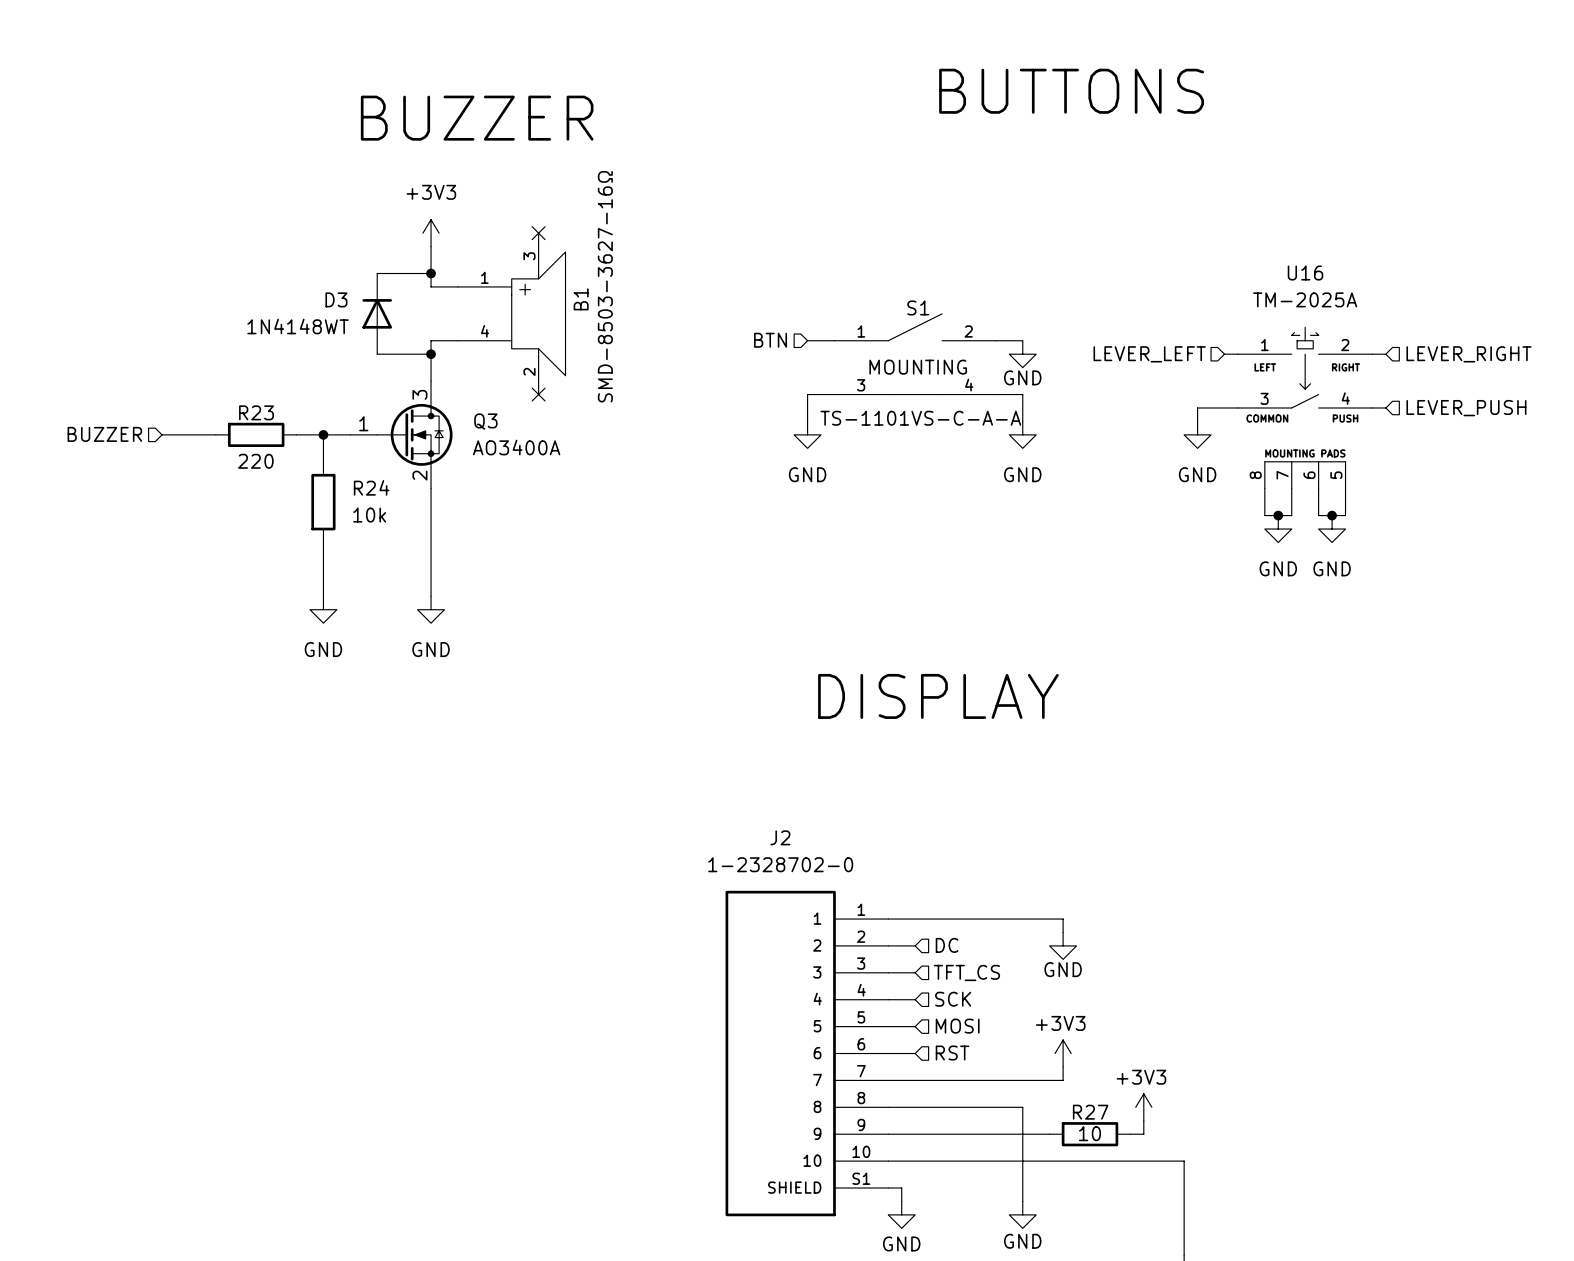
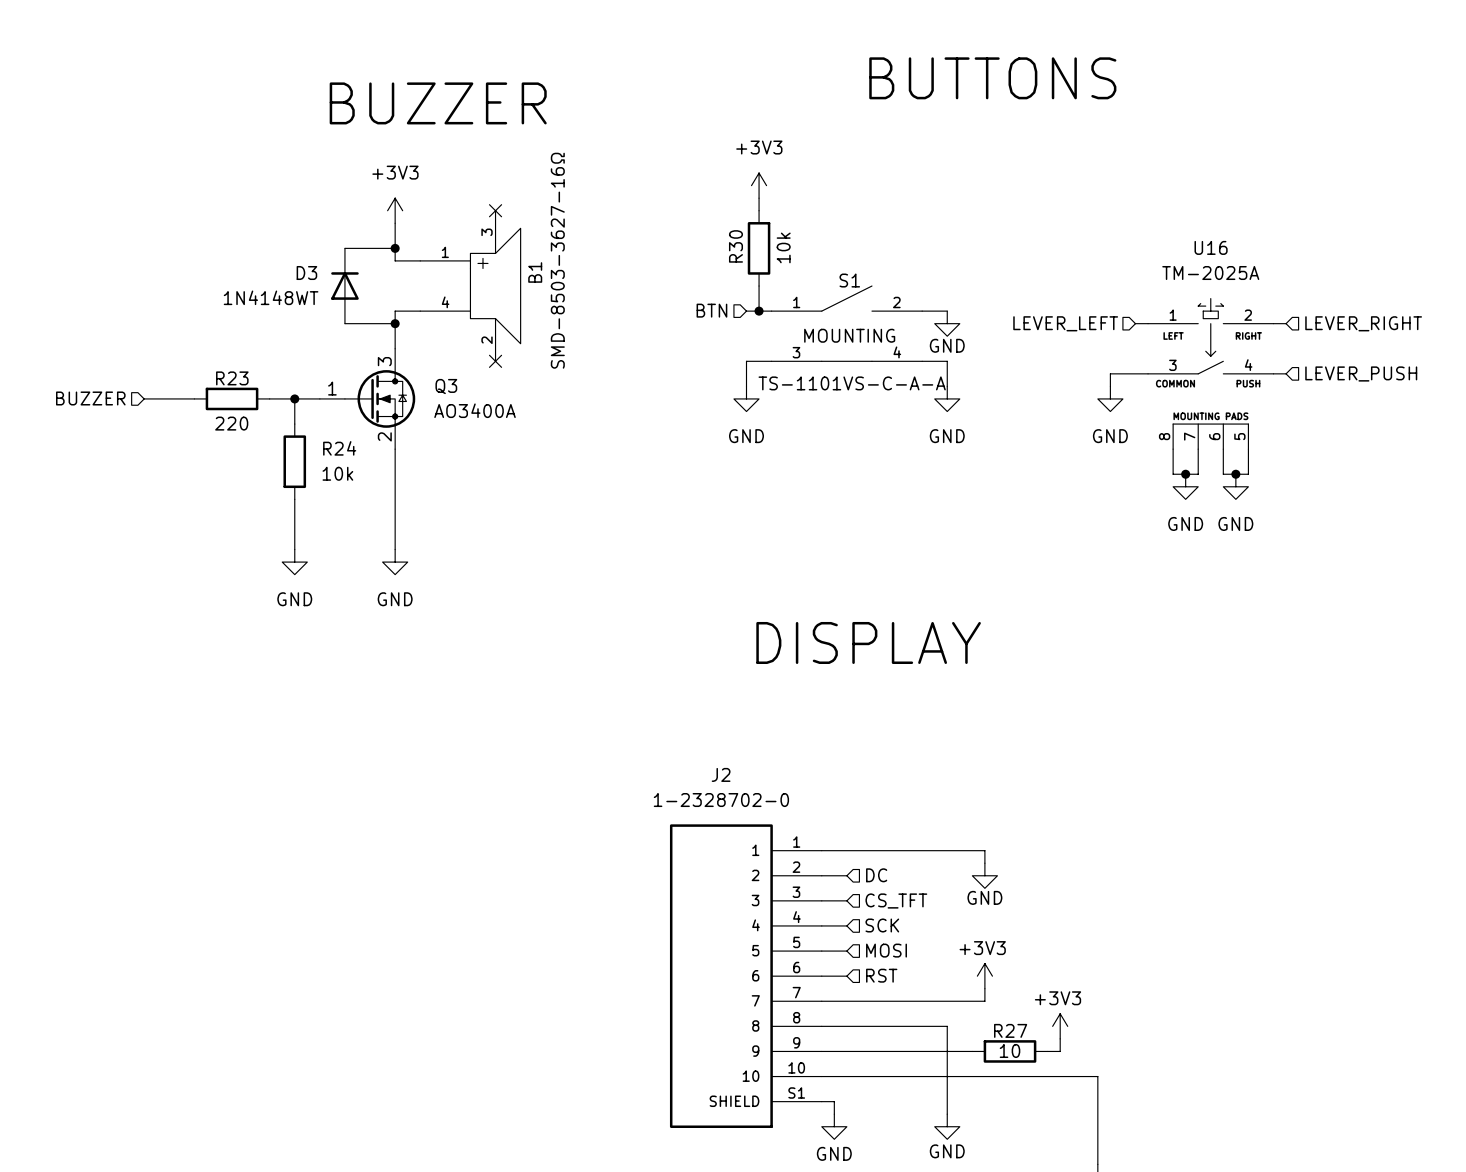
power symbol: none -> +3V3 (759, 185)
wire: none -> (759, 198) (759, 210)
R30: none -> 10k (759, 248)
wire: none -> (759, 286) (759, 311)
junction: none -> (759, 311)
hierarchical label: TFT_CS (966, 972) -> CS_TFT (896, 901)

